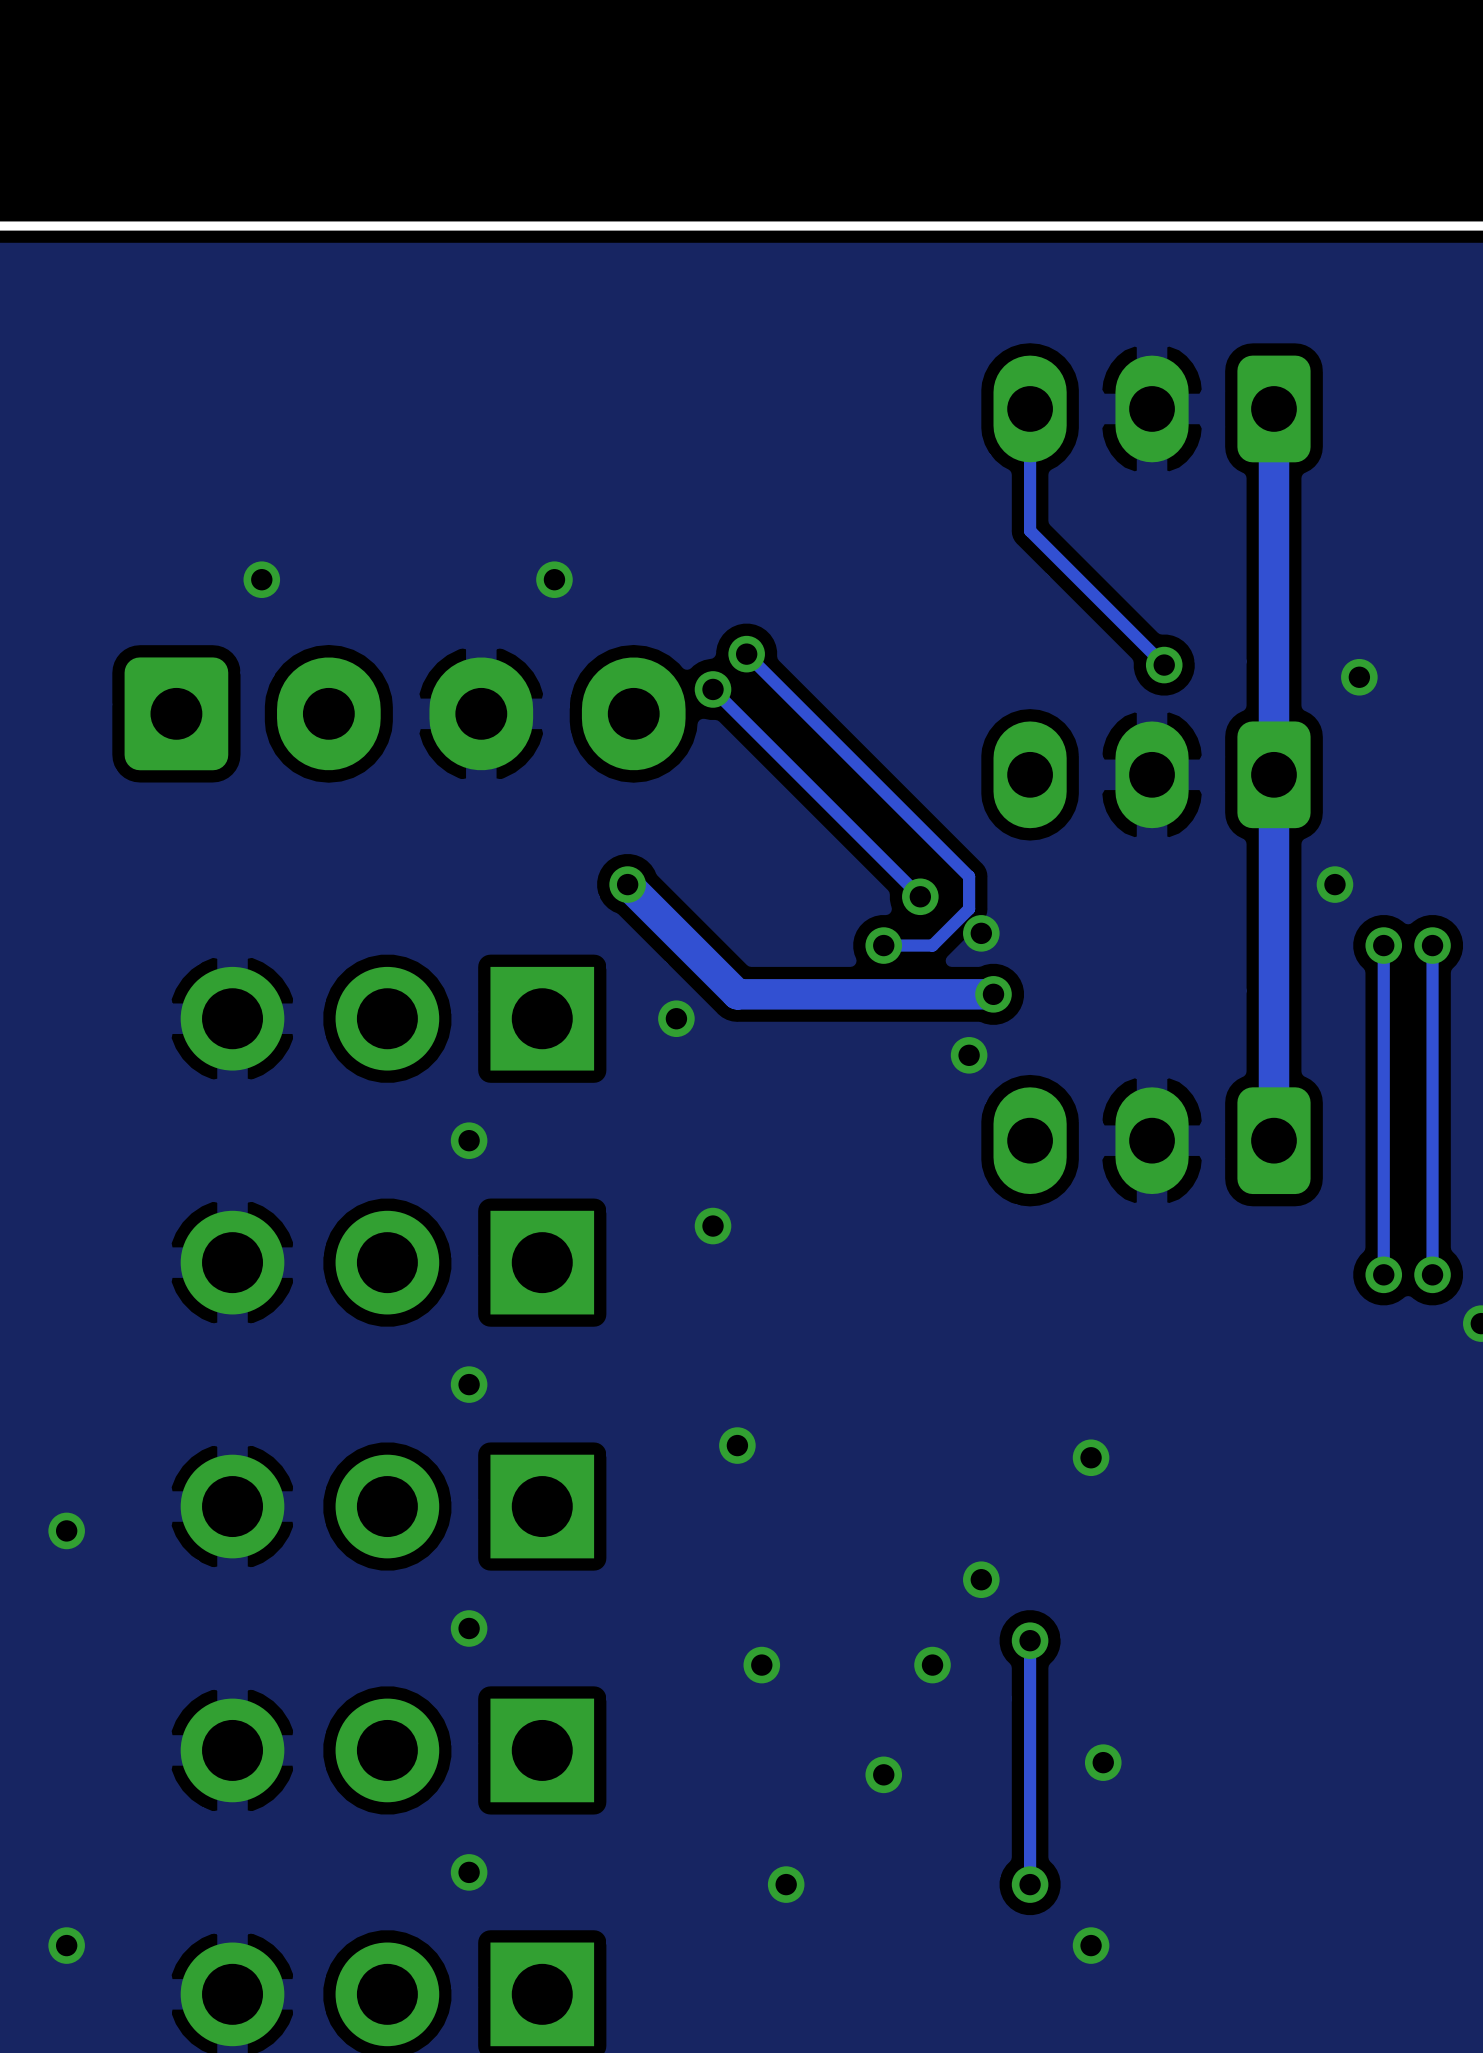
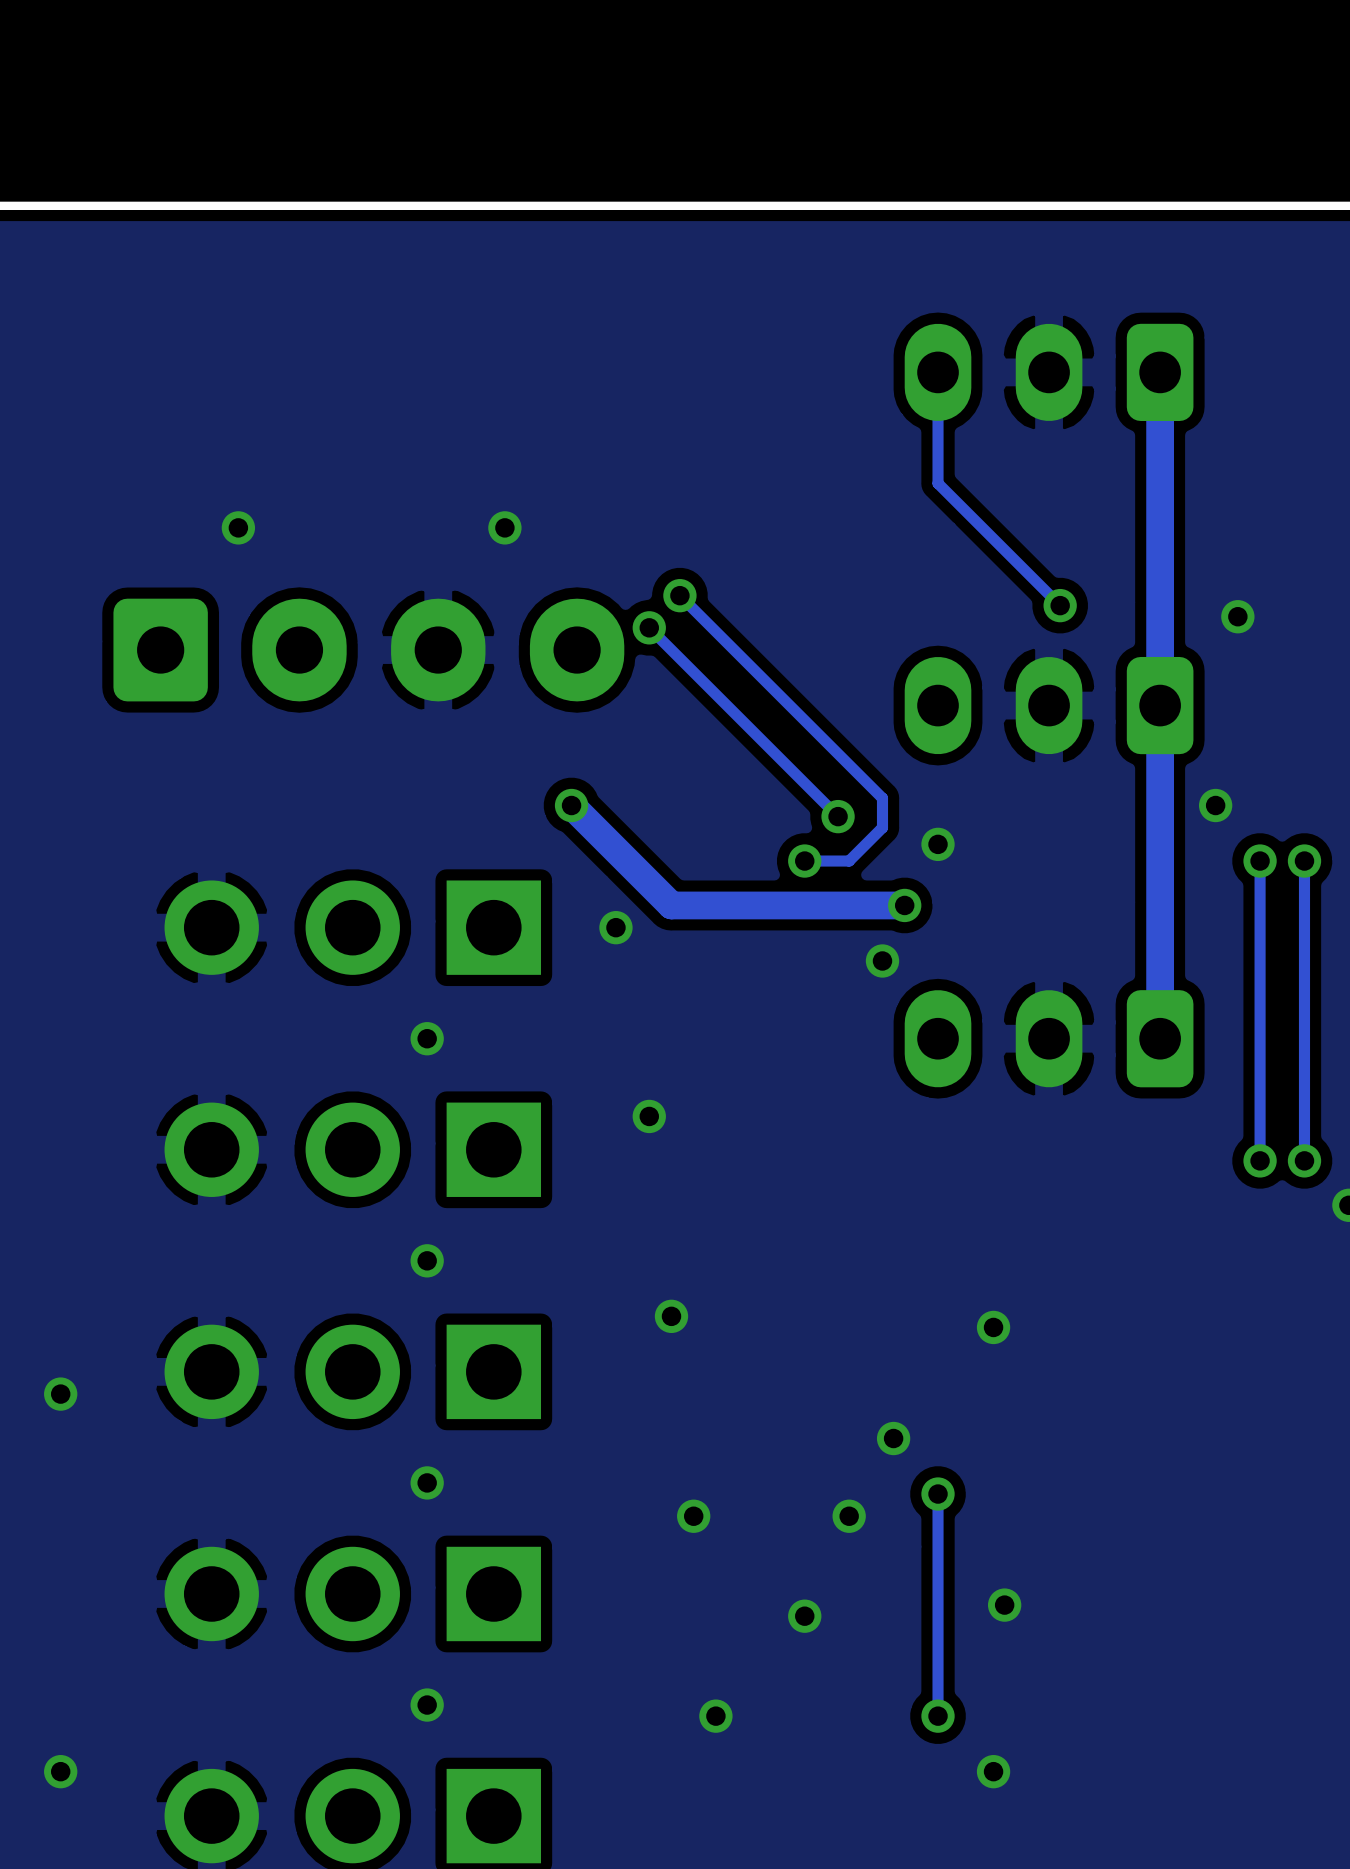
via position: (981, 933) -> (938, 844)

